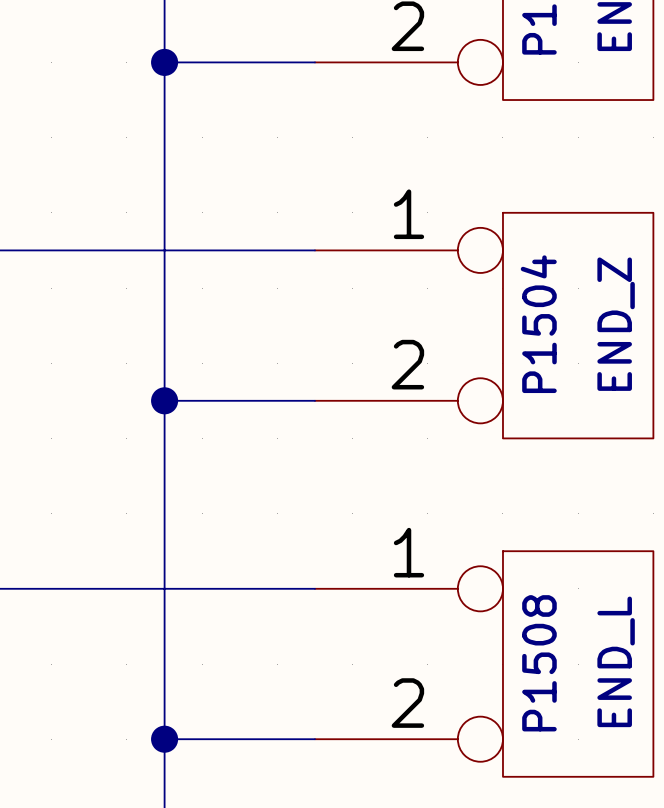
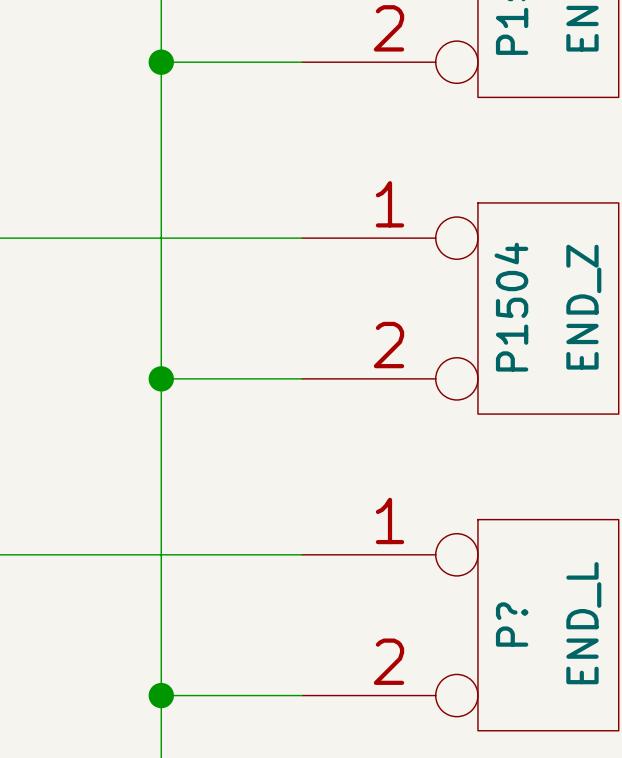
P1508 name: P1508 (539, 663) -> P? (512, 624)

